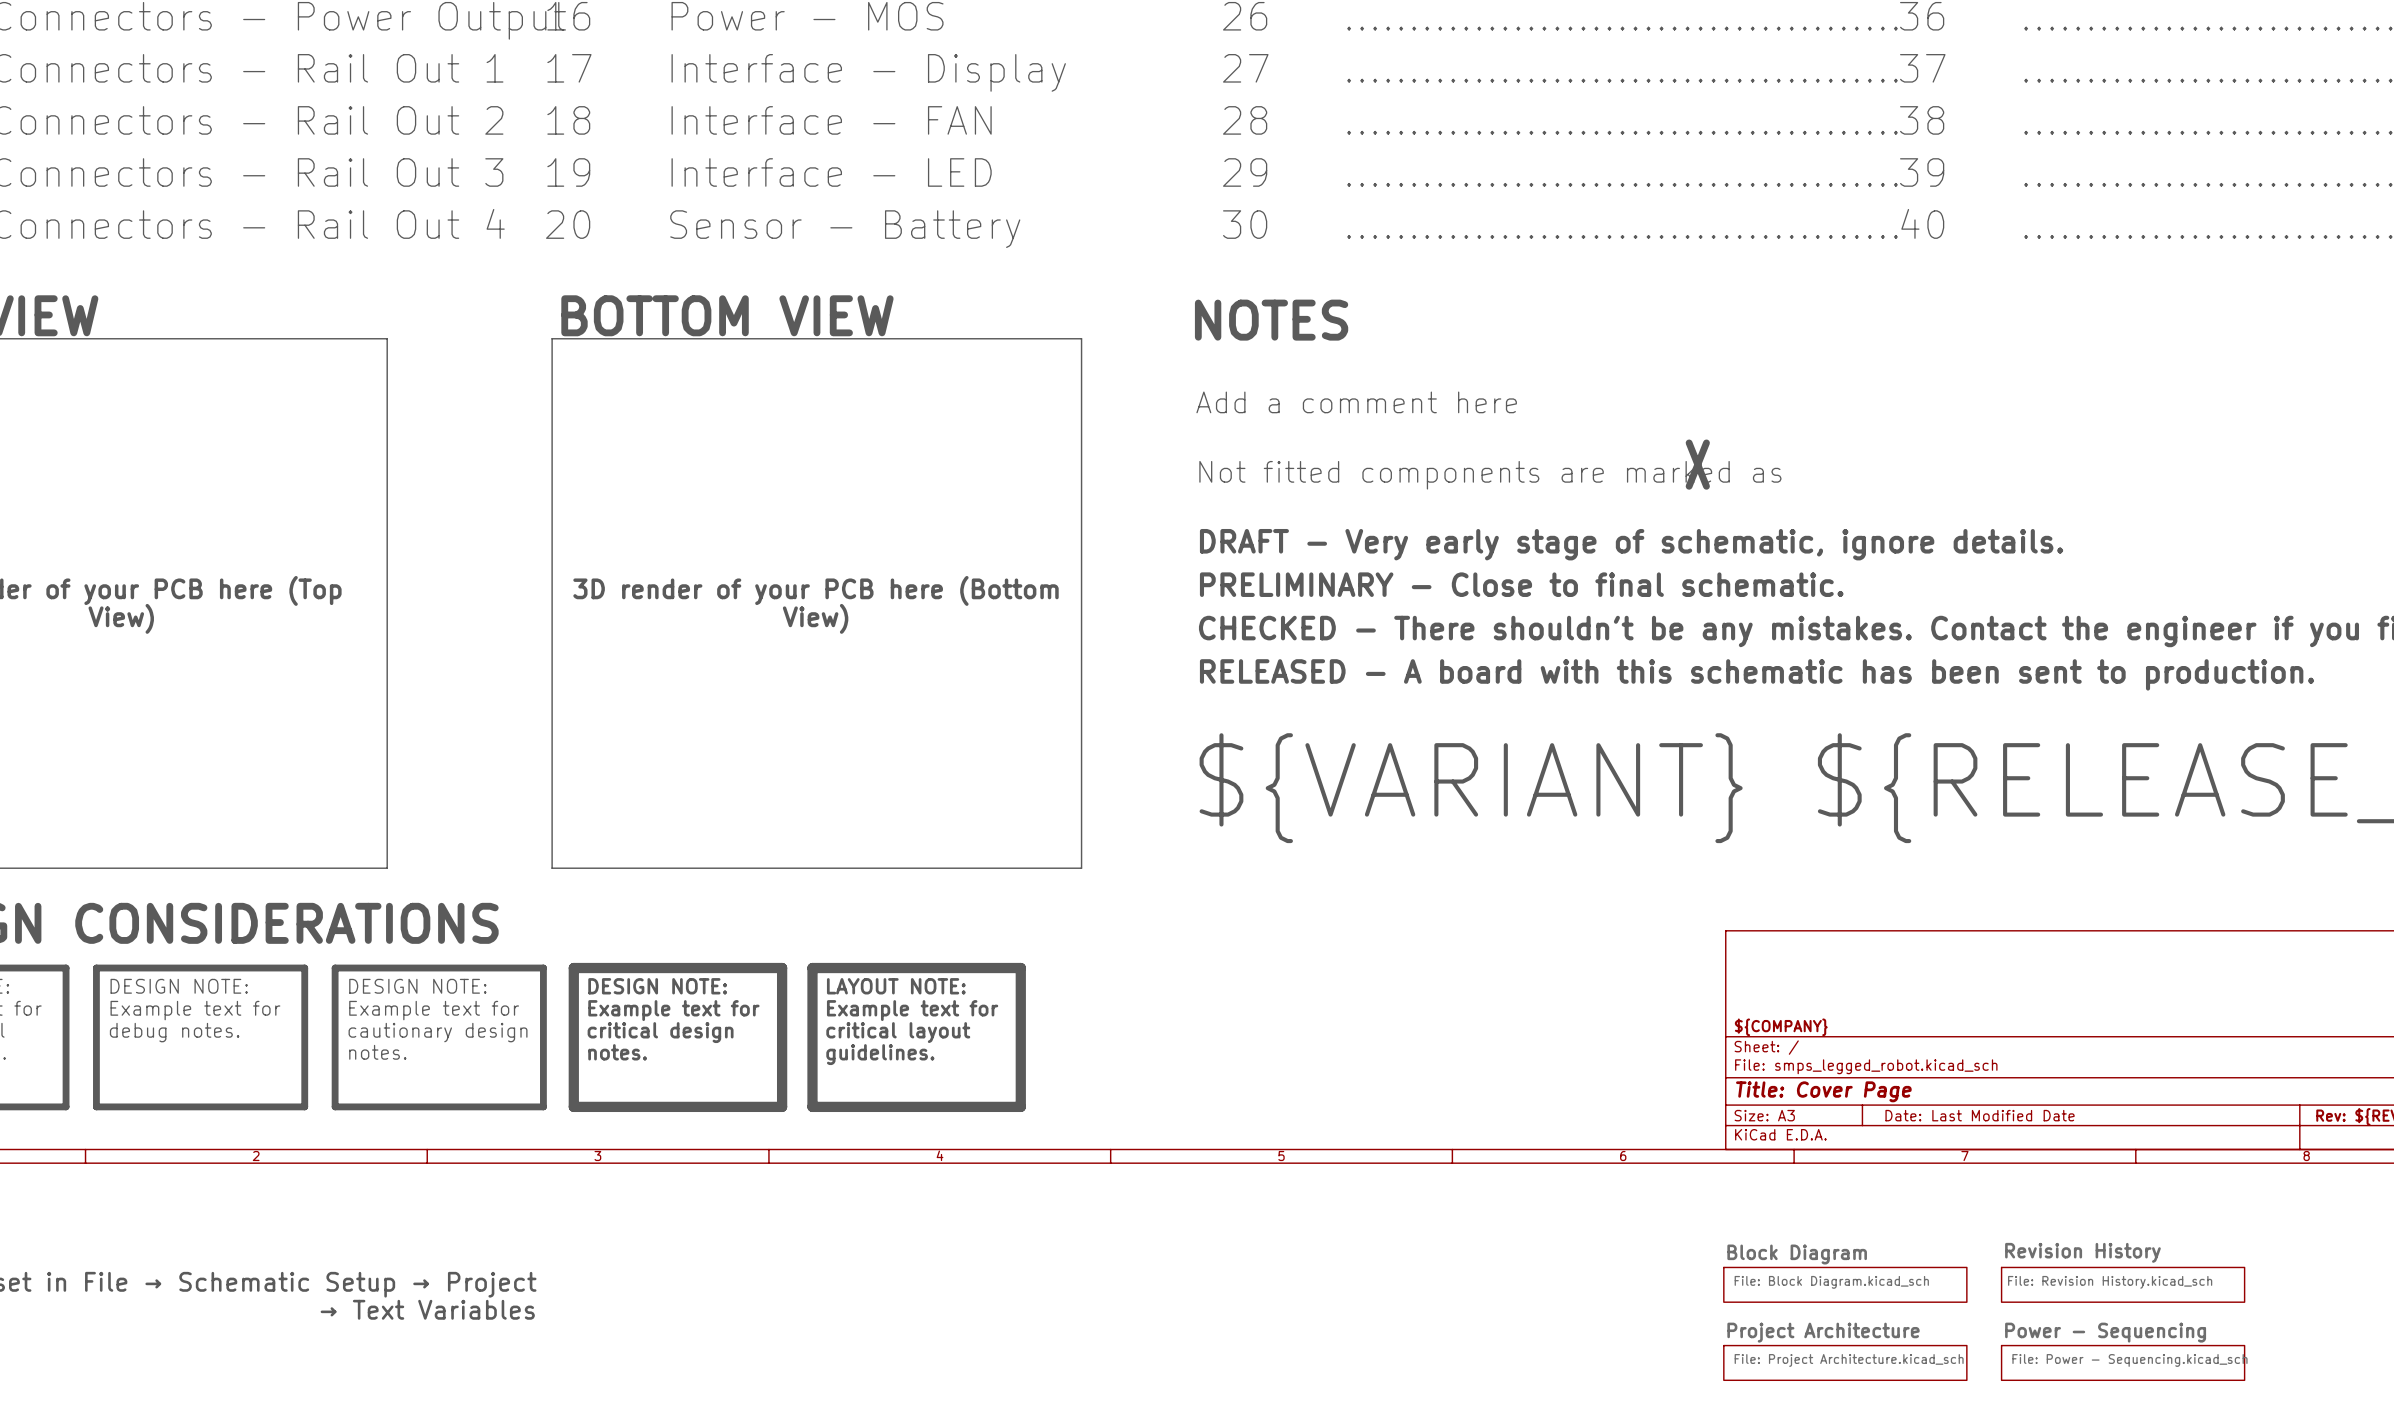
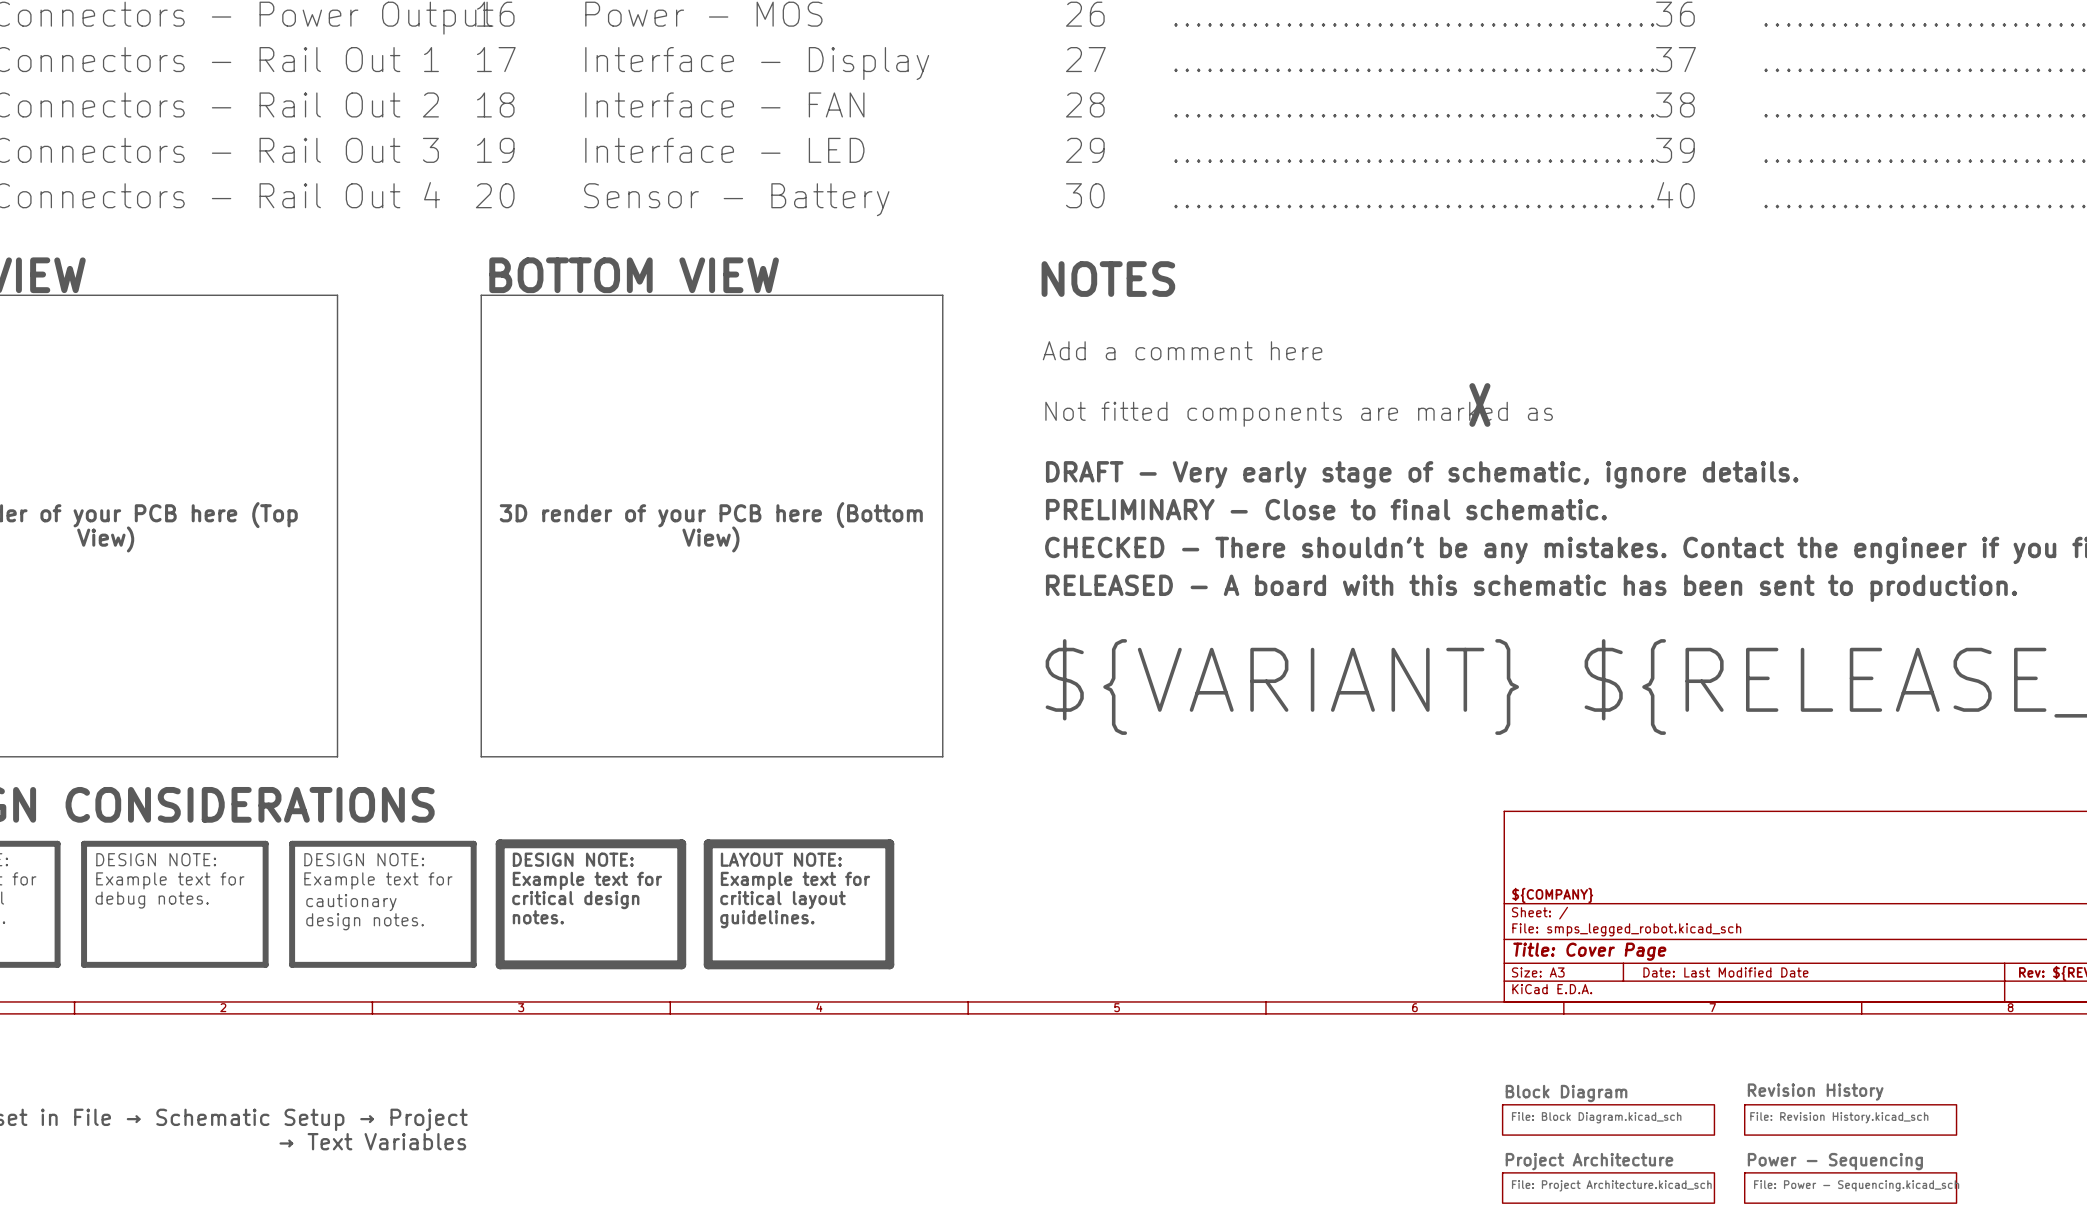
text: cautionary design (438, 1032) -> cautionary (351, 902)
text: notes. (377, 1052) -> design notes. (365, 921)

